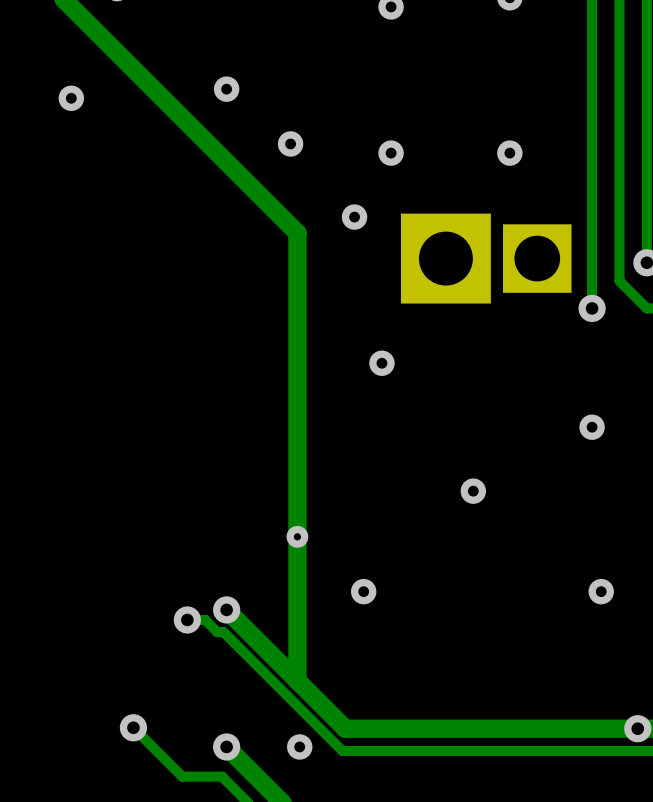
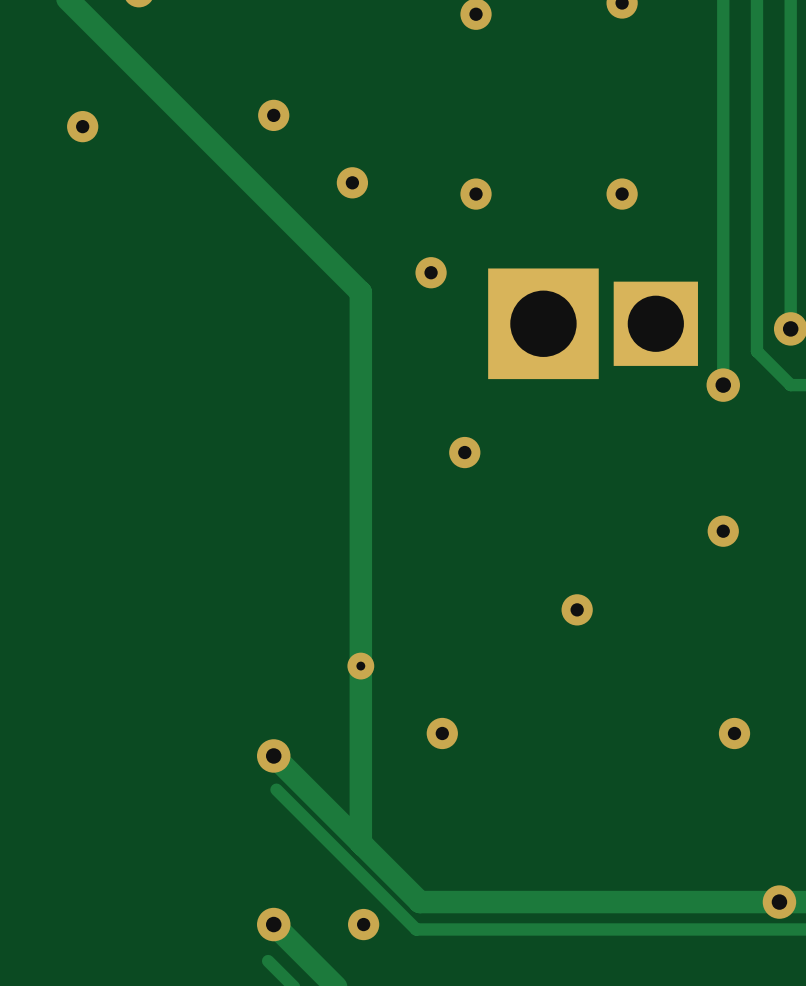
track: (187, 619) (204, 619) (217, 632) (223, 632) (228, 637) -> none
via: (187, 619) -> none
track: (133, 727) (182, 776) (222, 776) -> none
via: (133, 727) -> none

